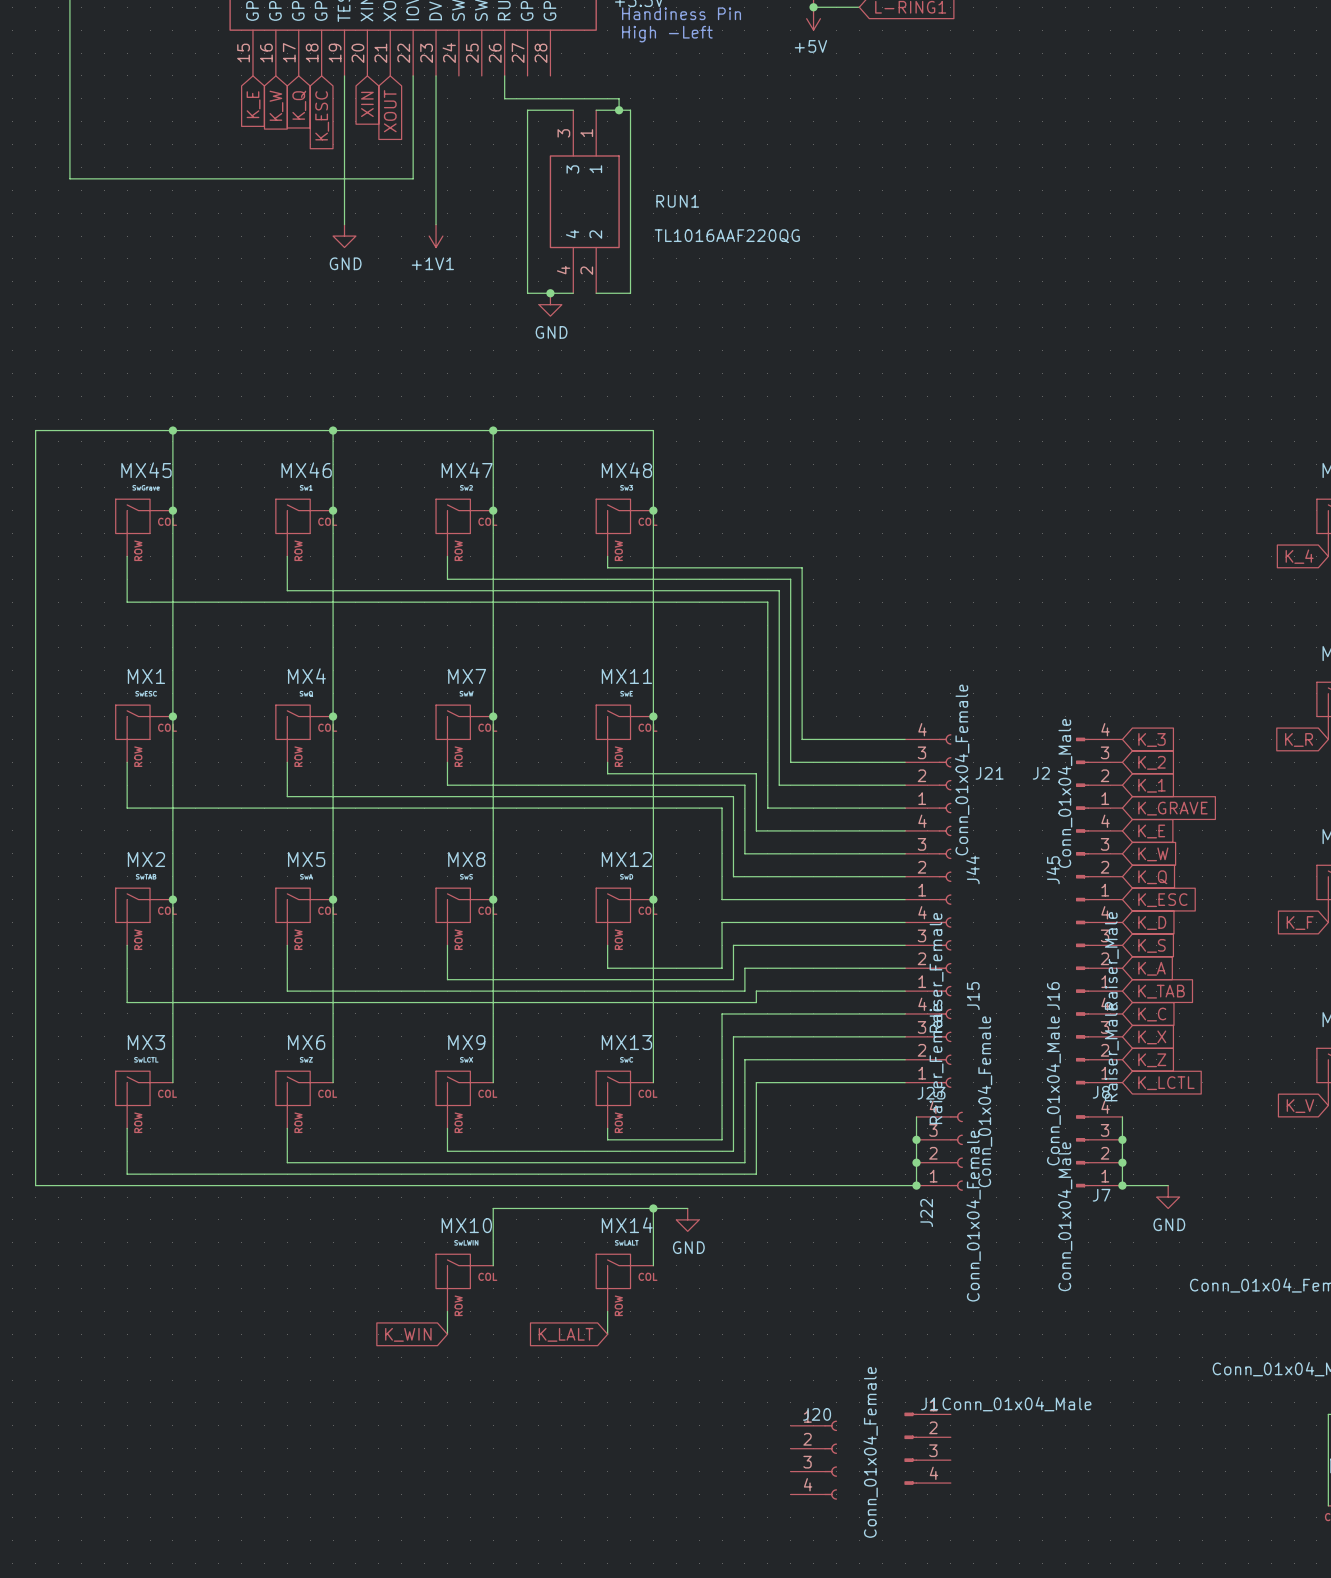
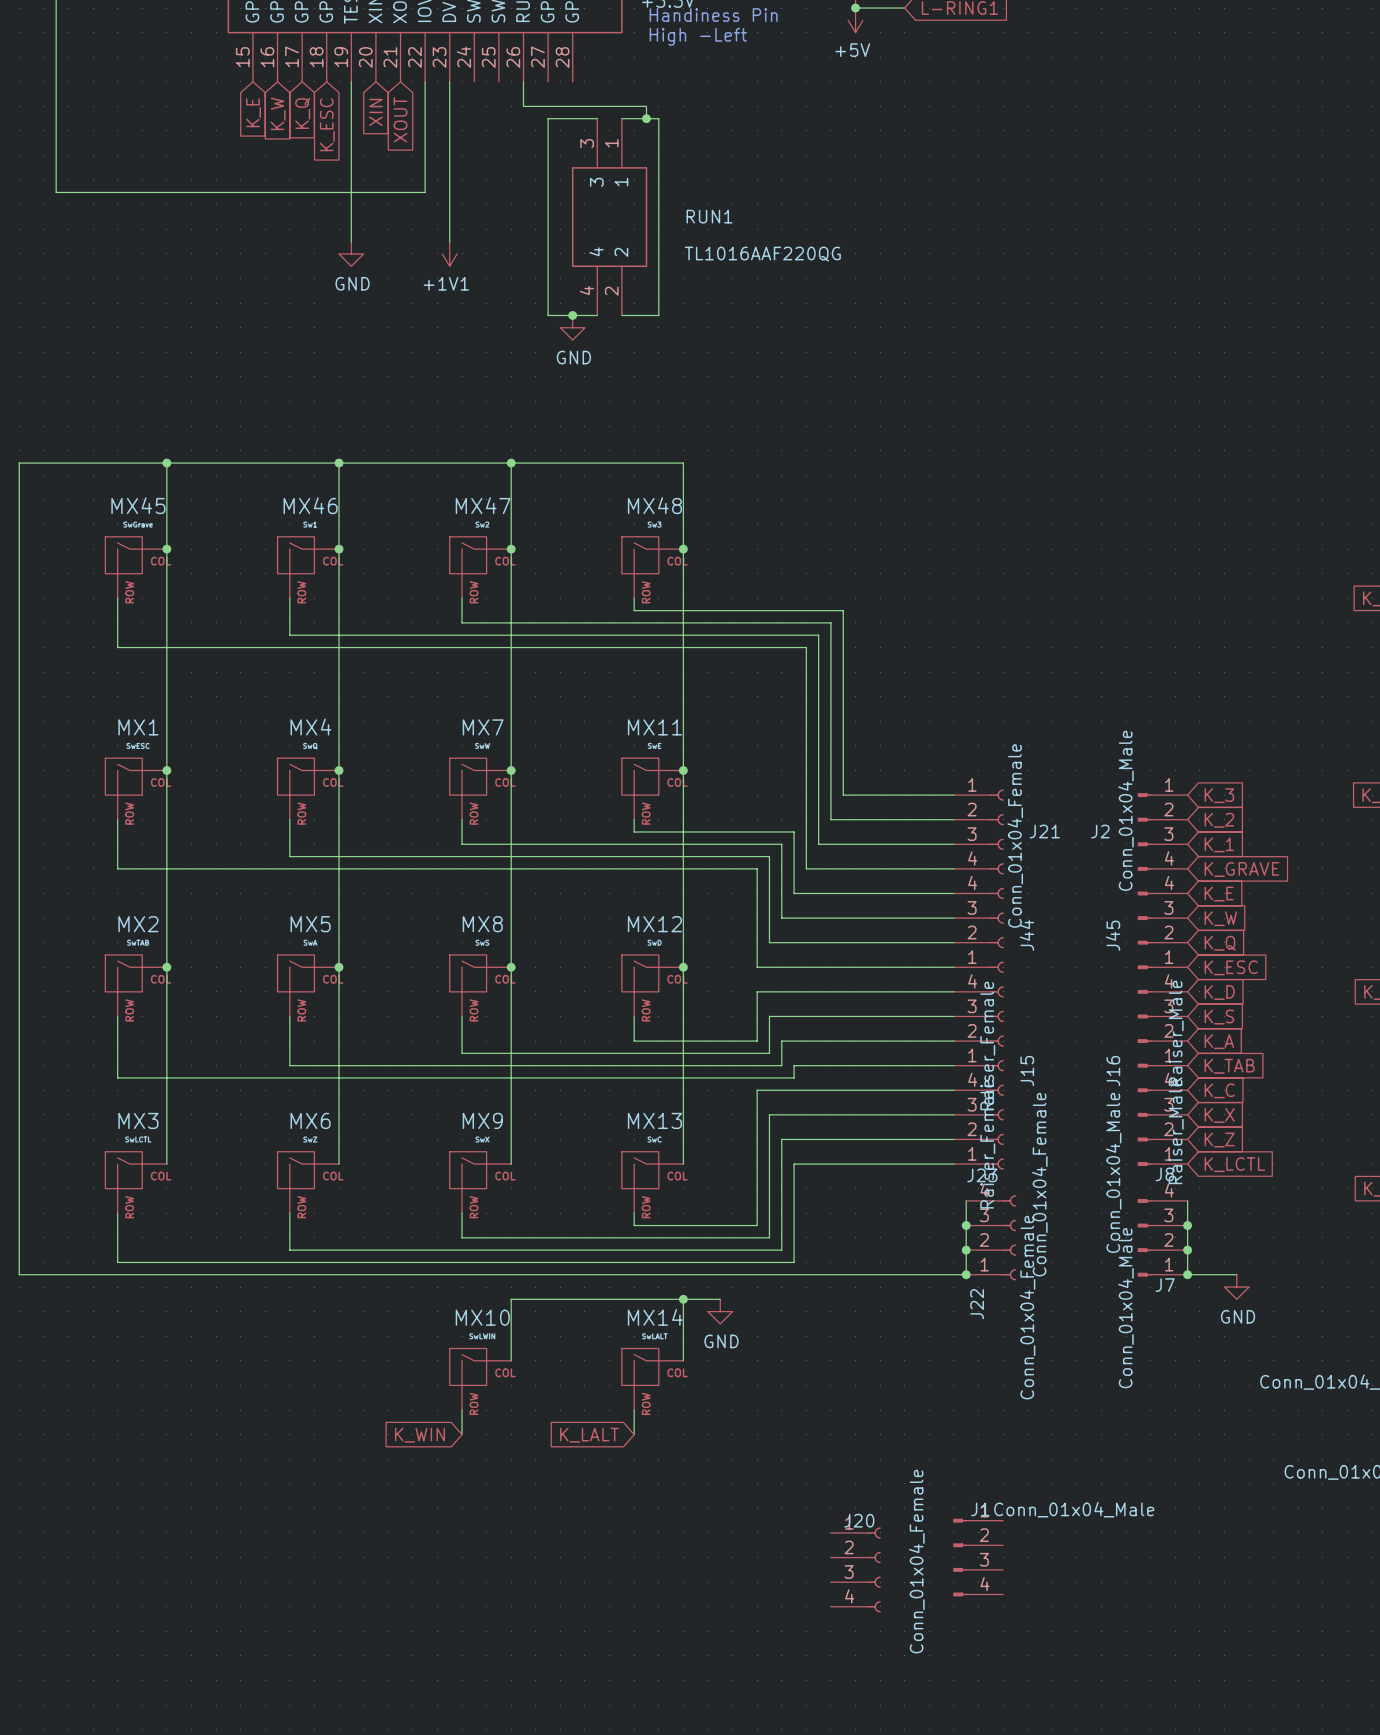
J21 flip: as is (945, 773) -> up-down (996, 831)
J2 flip: as is (1082, 773) -> up-down (1144, 831)

